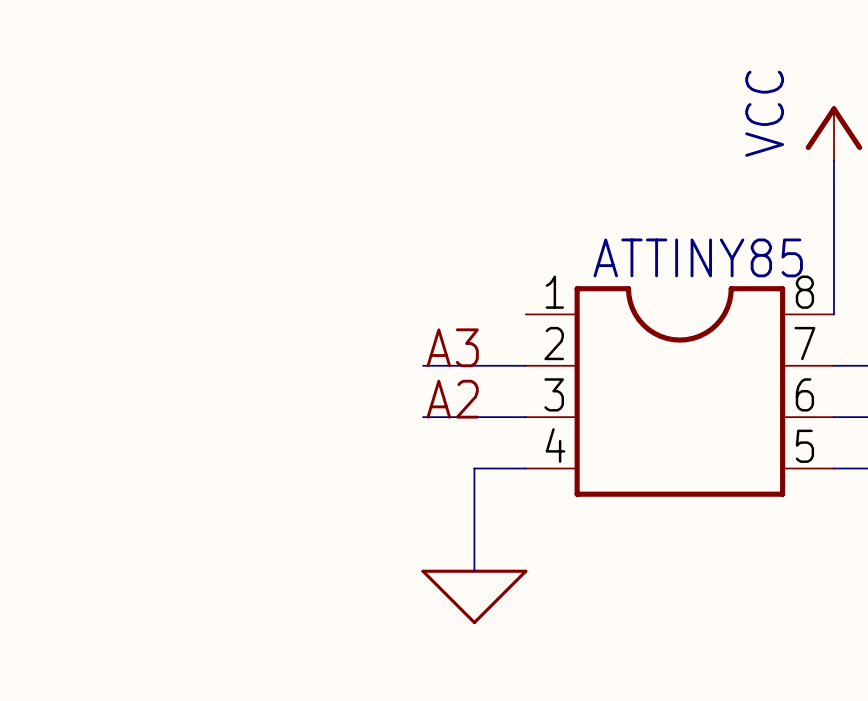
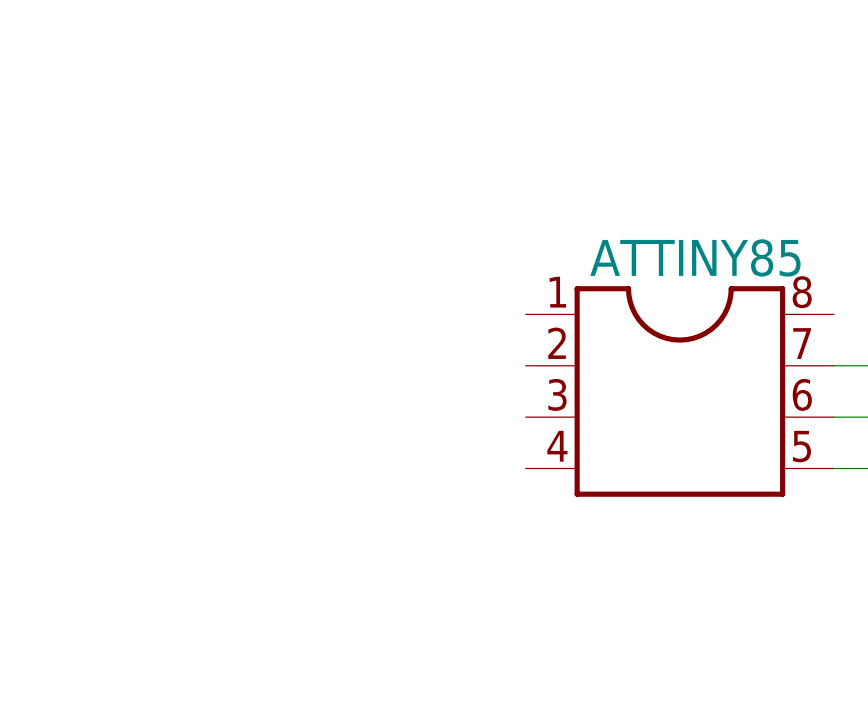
power symbol: VCC (833, 133) -> none
wire: (833, 160) (833, 314) -> none
label: A3 (452, 347) -> none
wire: (423, 365) (525, 365) -> none
label: A2 (452, 399) -> none
wire: (423, 417) (525, 417) -> none
wire: (525, 468) (474, 468) (474, 571) -> none
power symbol: (474, 596) -> none

